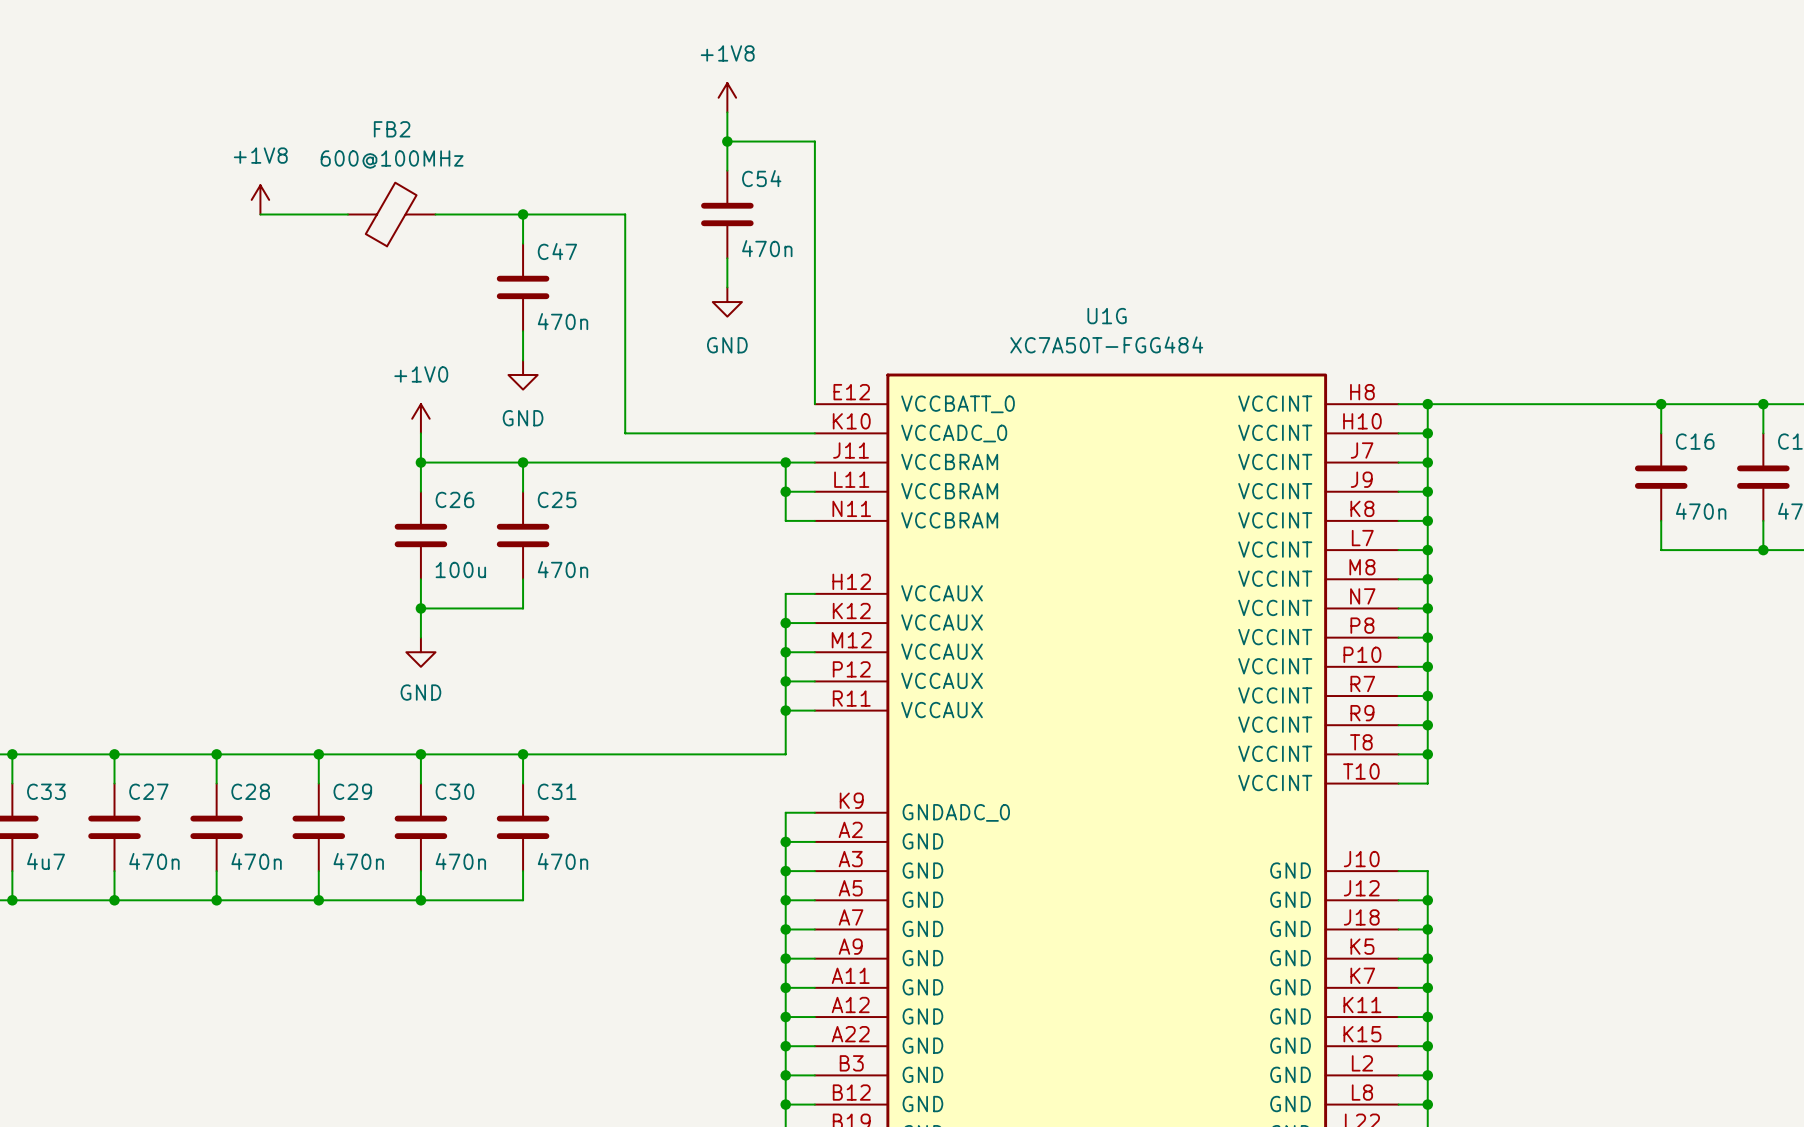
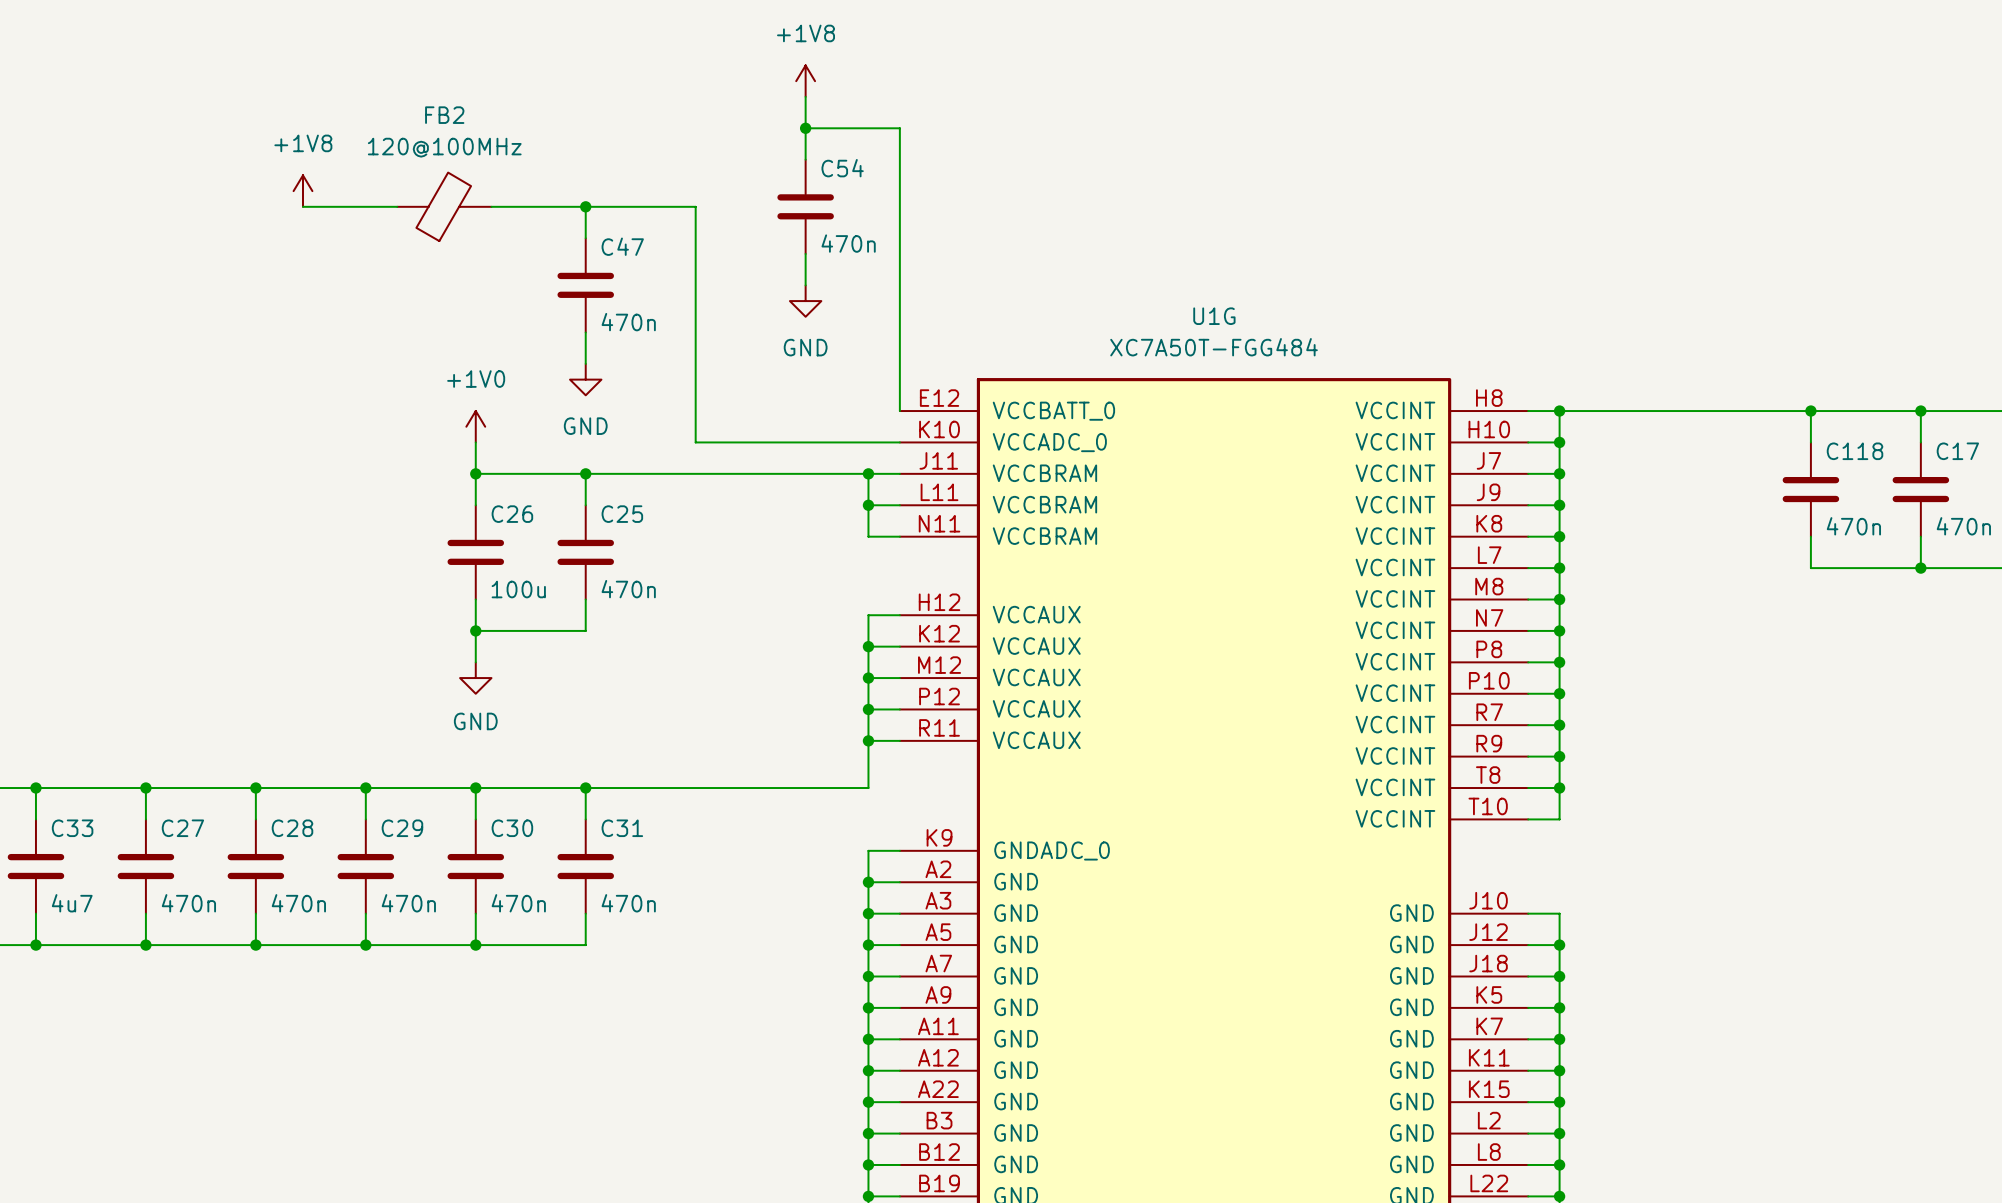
FB2 value: 600@100MHz (392, 159) -> 120@100MHz (444, 147)
C16 name: C16 (1695, 441) -> C118 (1855, 451)

